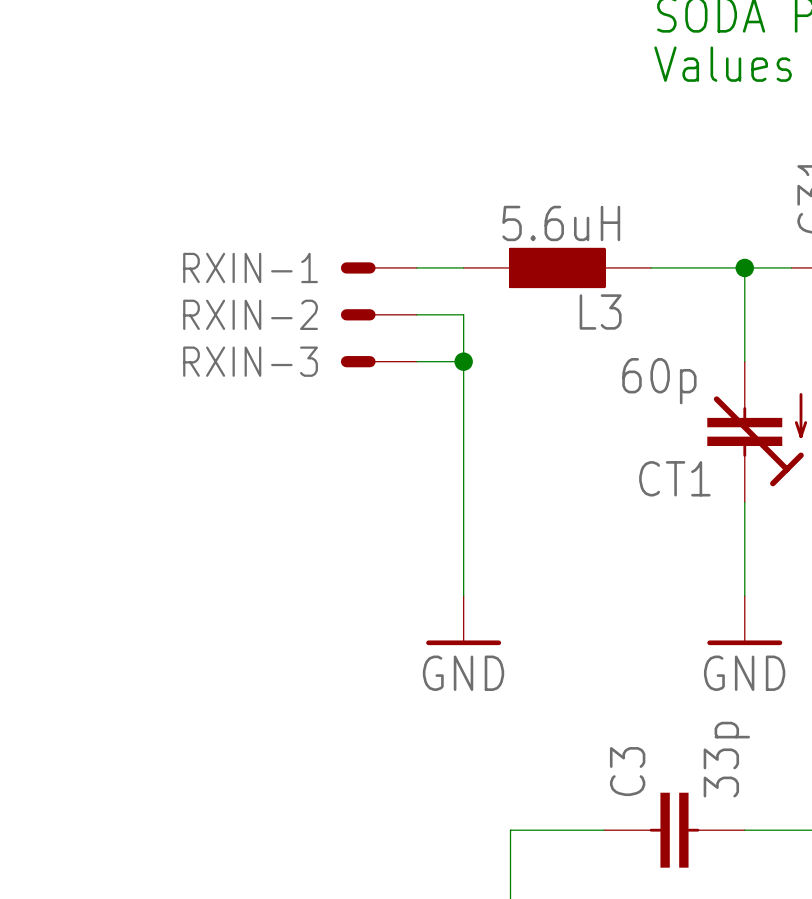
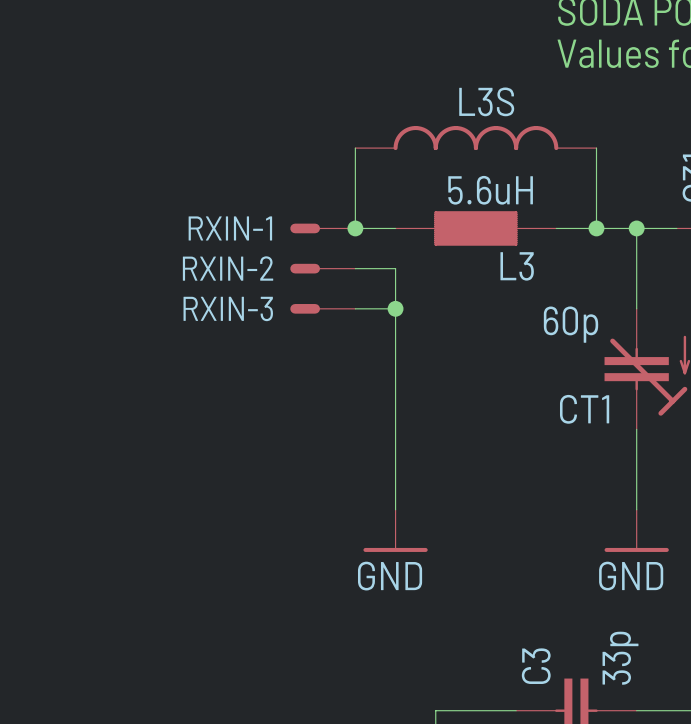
L3S: none -> (475, 138)
wire: none -> (355, 148) (355, 228)
wire: none -> (596, 148) (596, 228)
junction: none -> (355, 228)
junction: none -> (596, 228)

